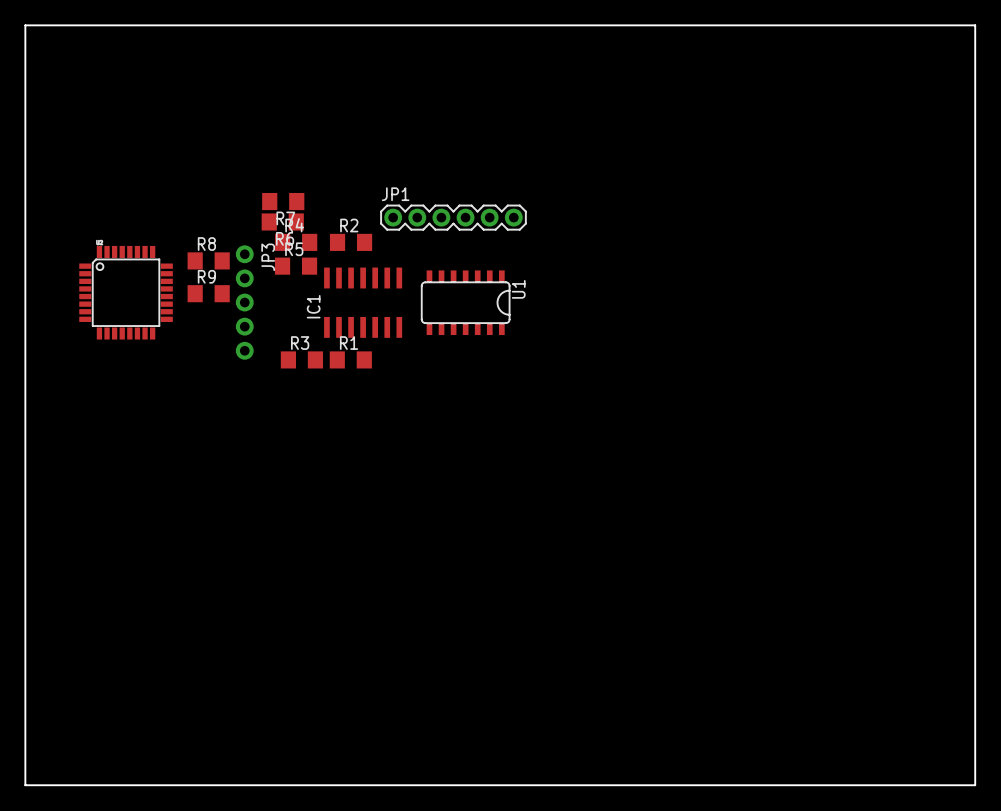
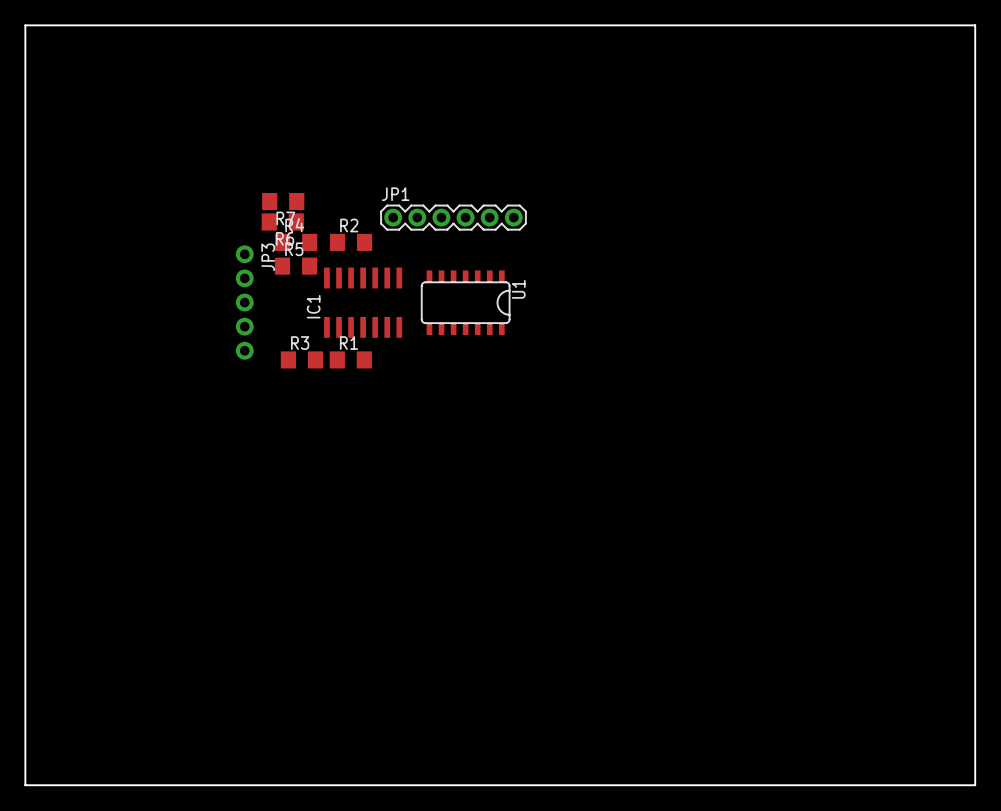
R8: (208, 260) -> none
part: (126, 292) -> none
R9: (208, 293) -> none

